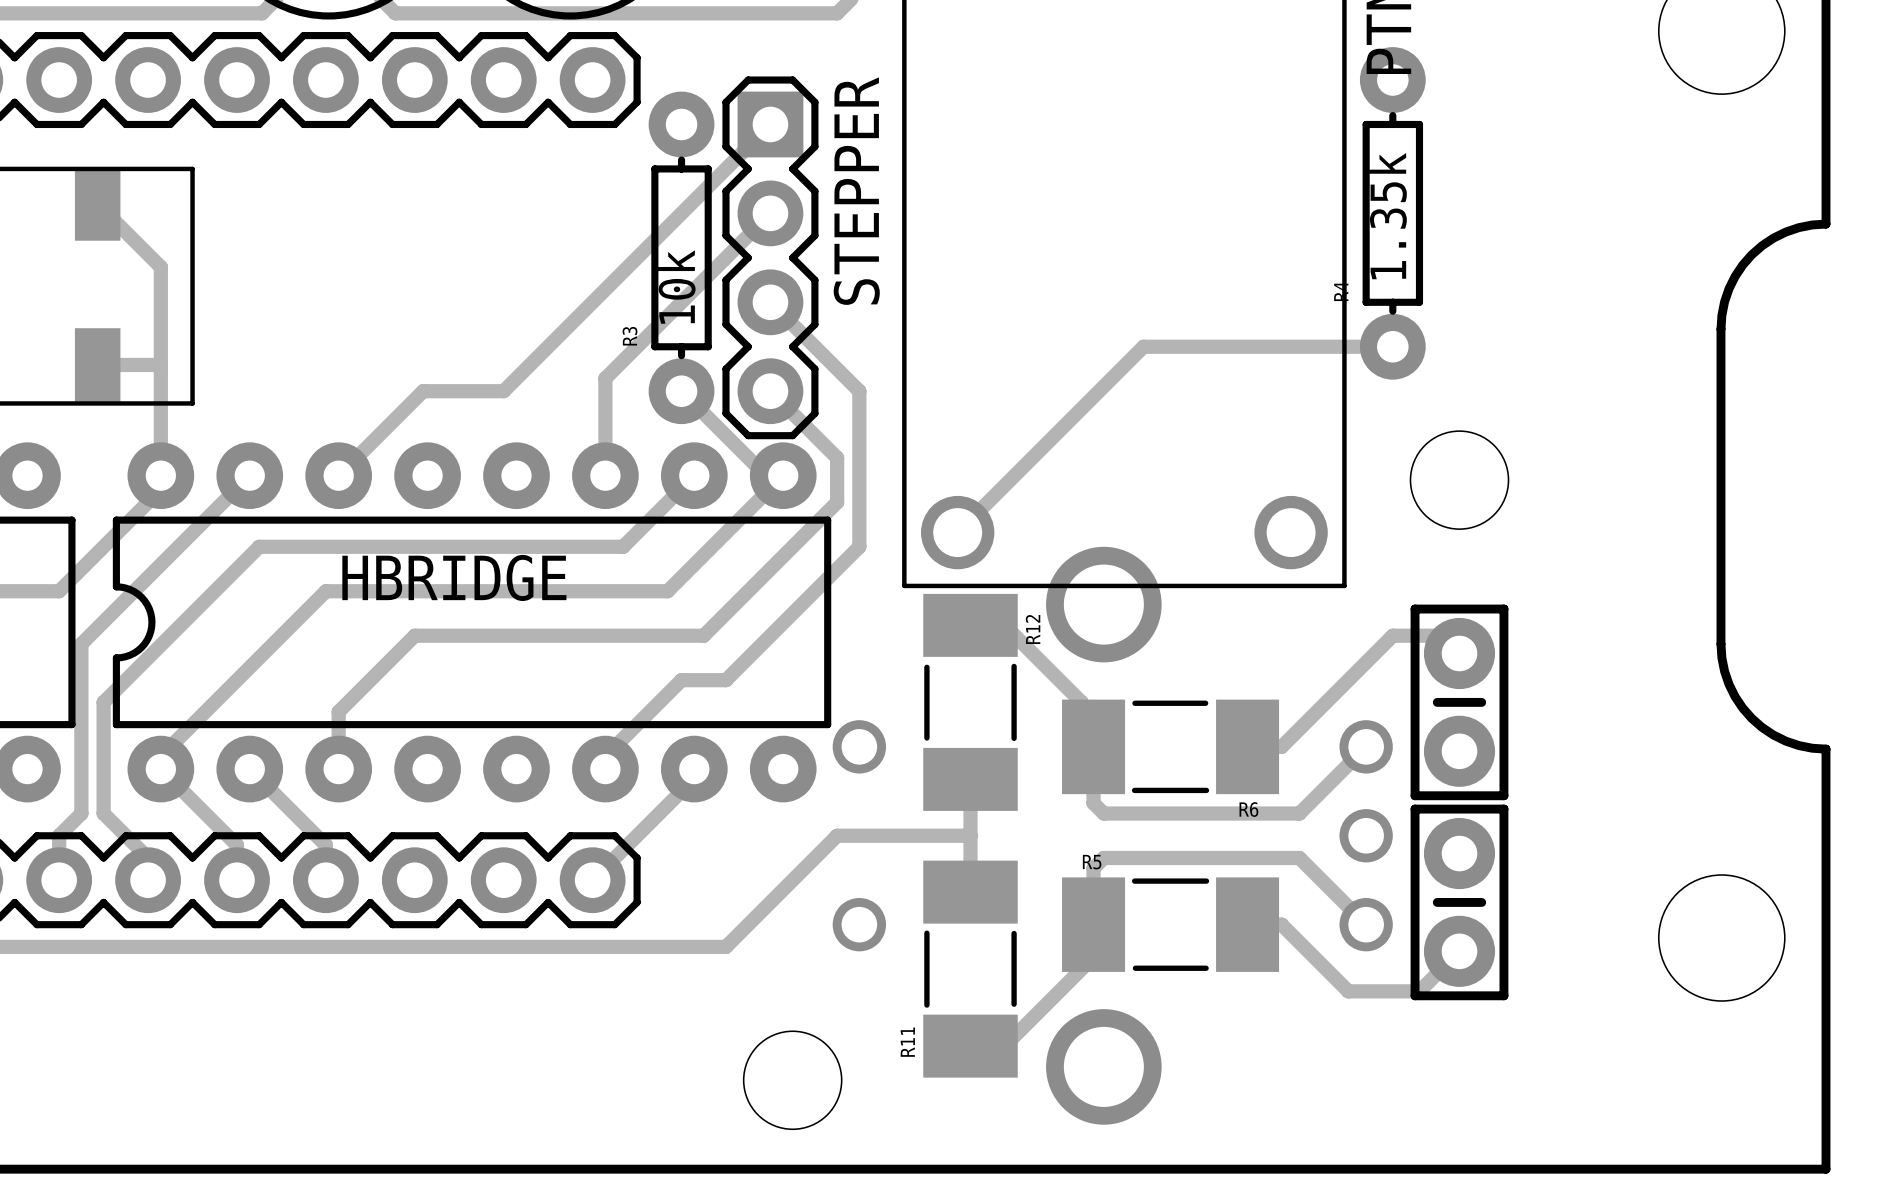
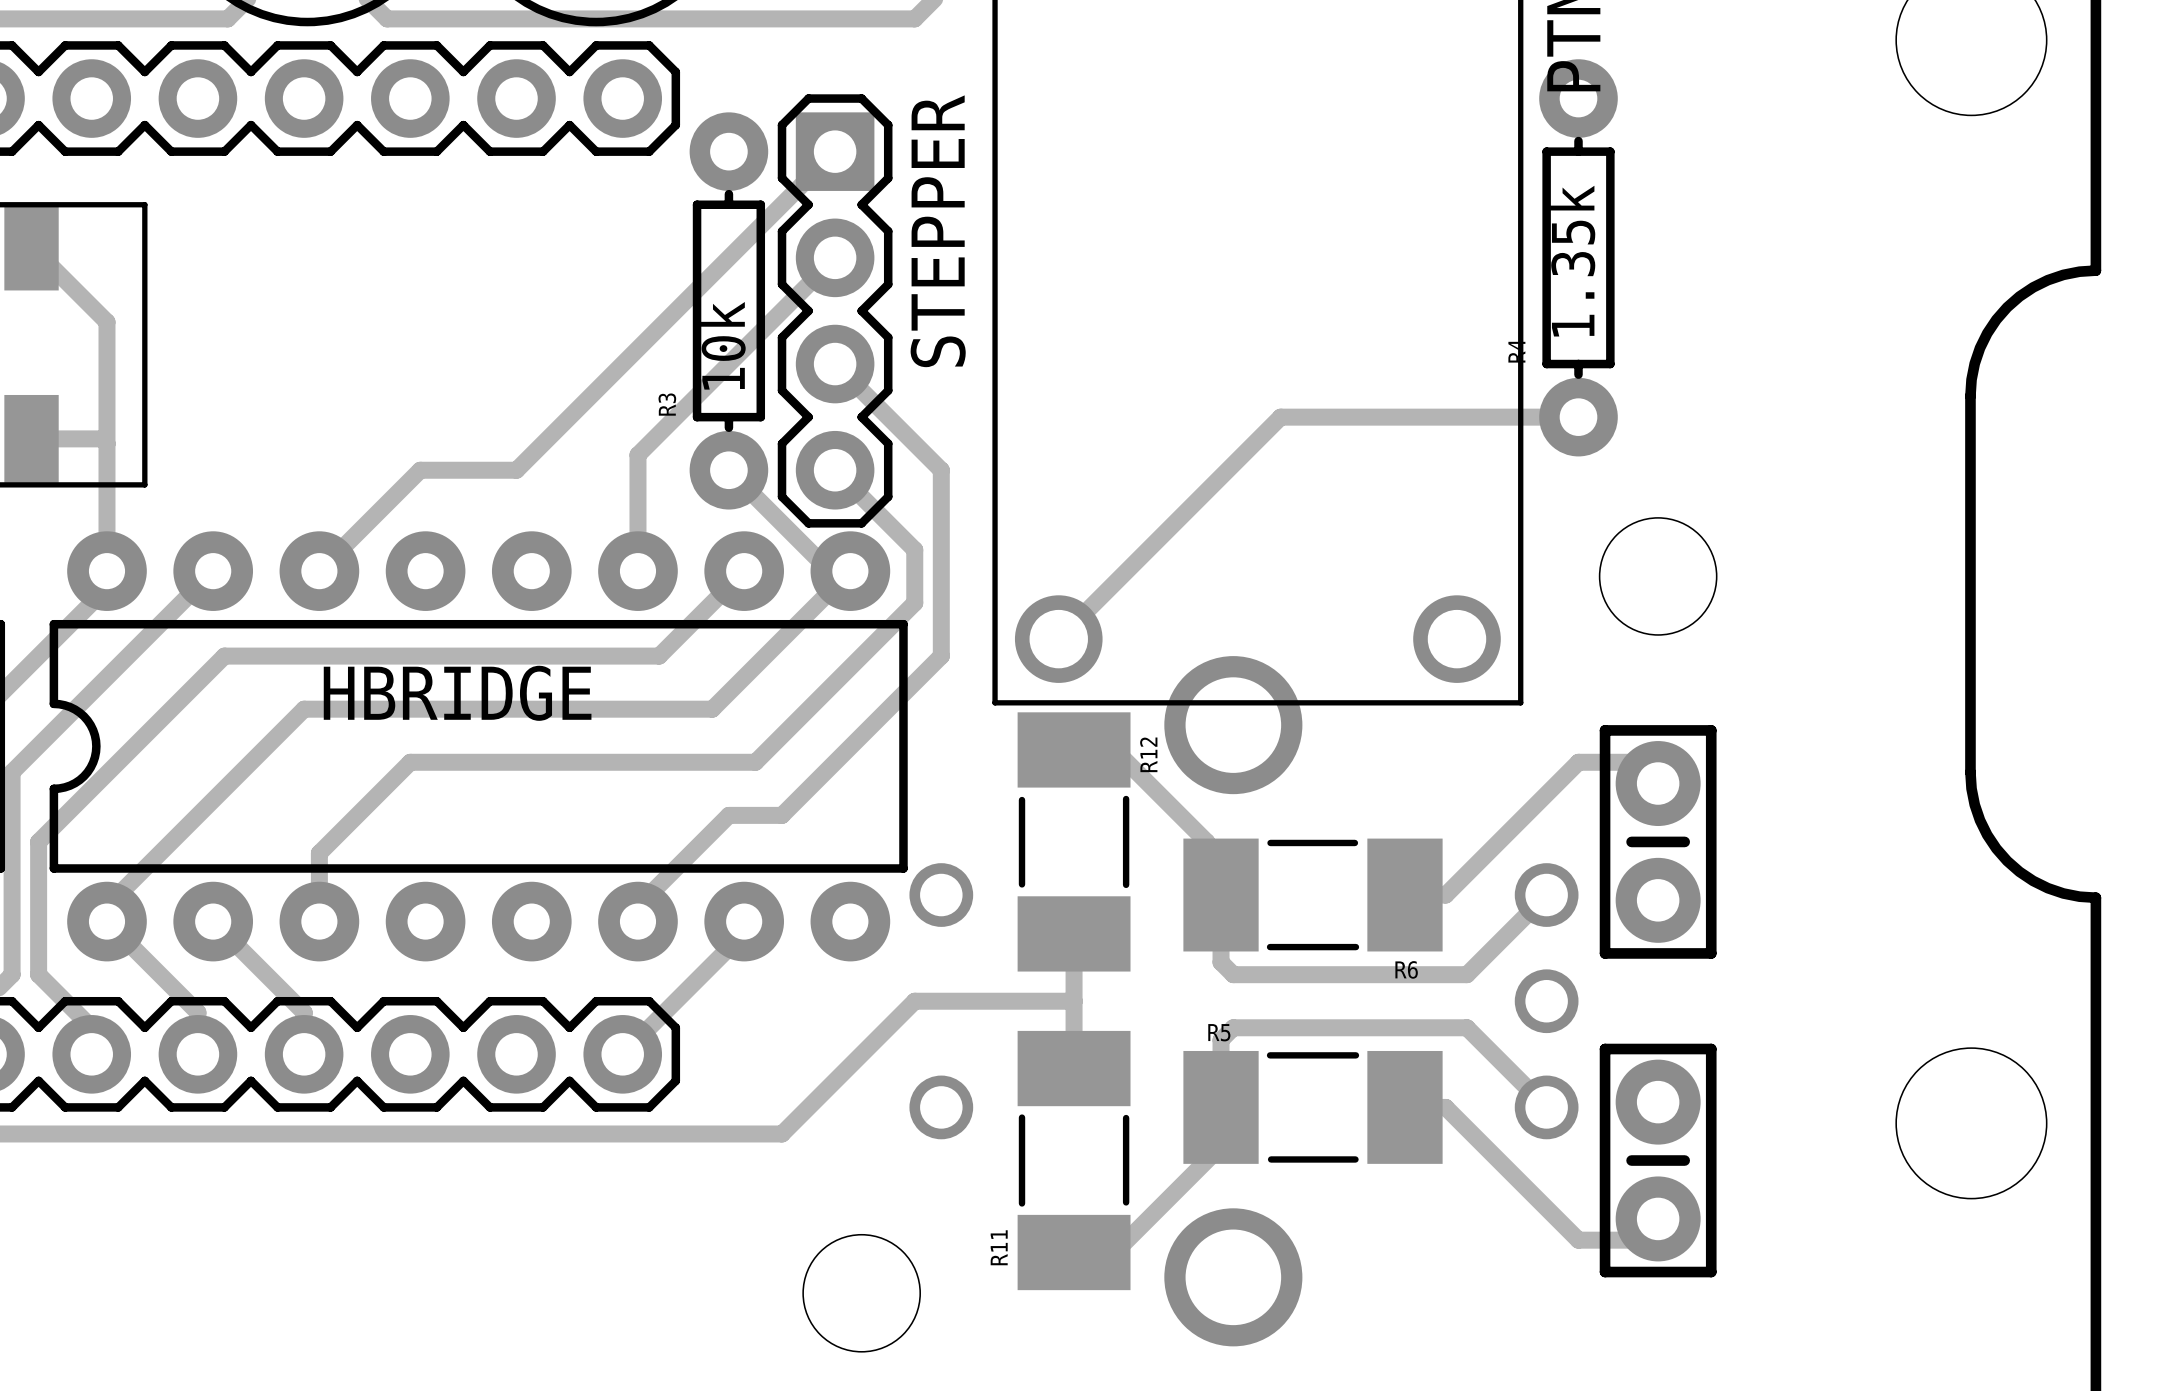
part position: (1459, 902) -> (1658, 1160)
track: (1459, 951) (1419, 991) (1348, 991) -> (1658, 1218) (1636, 1240) (1578, 1240) (1525, 1187)

